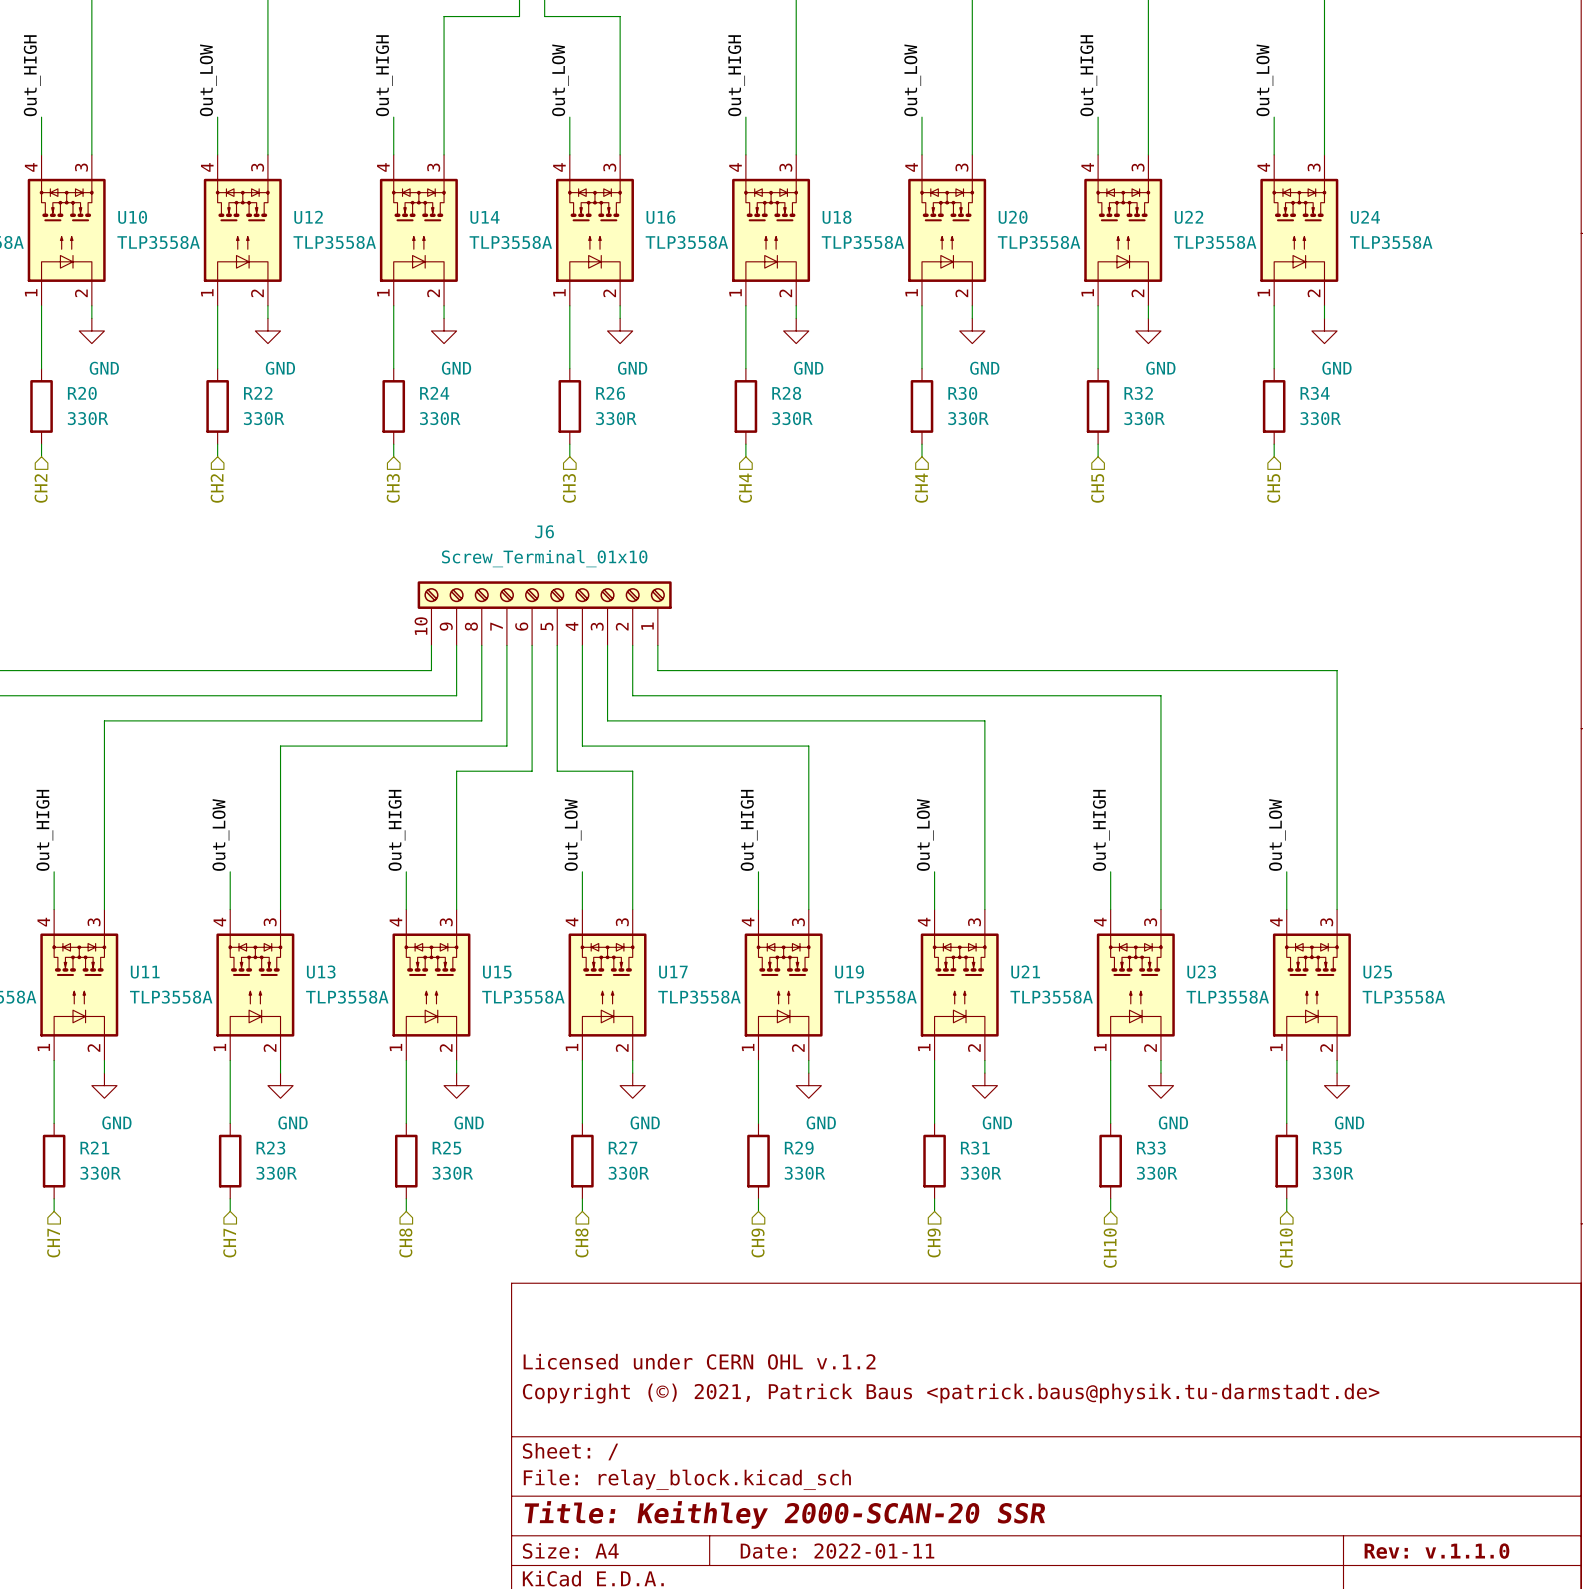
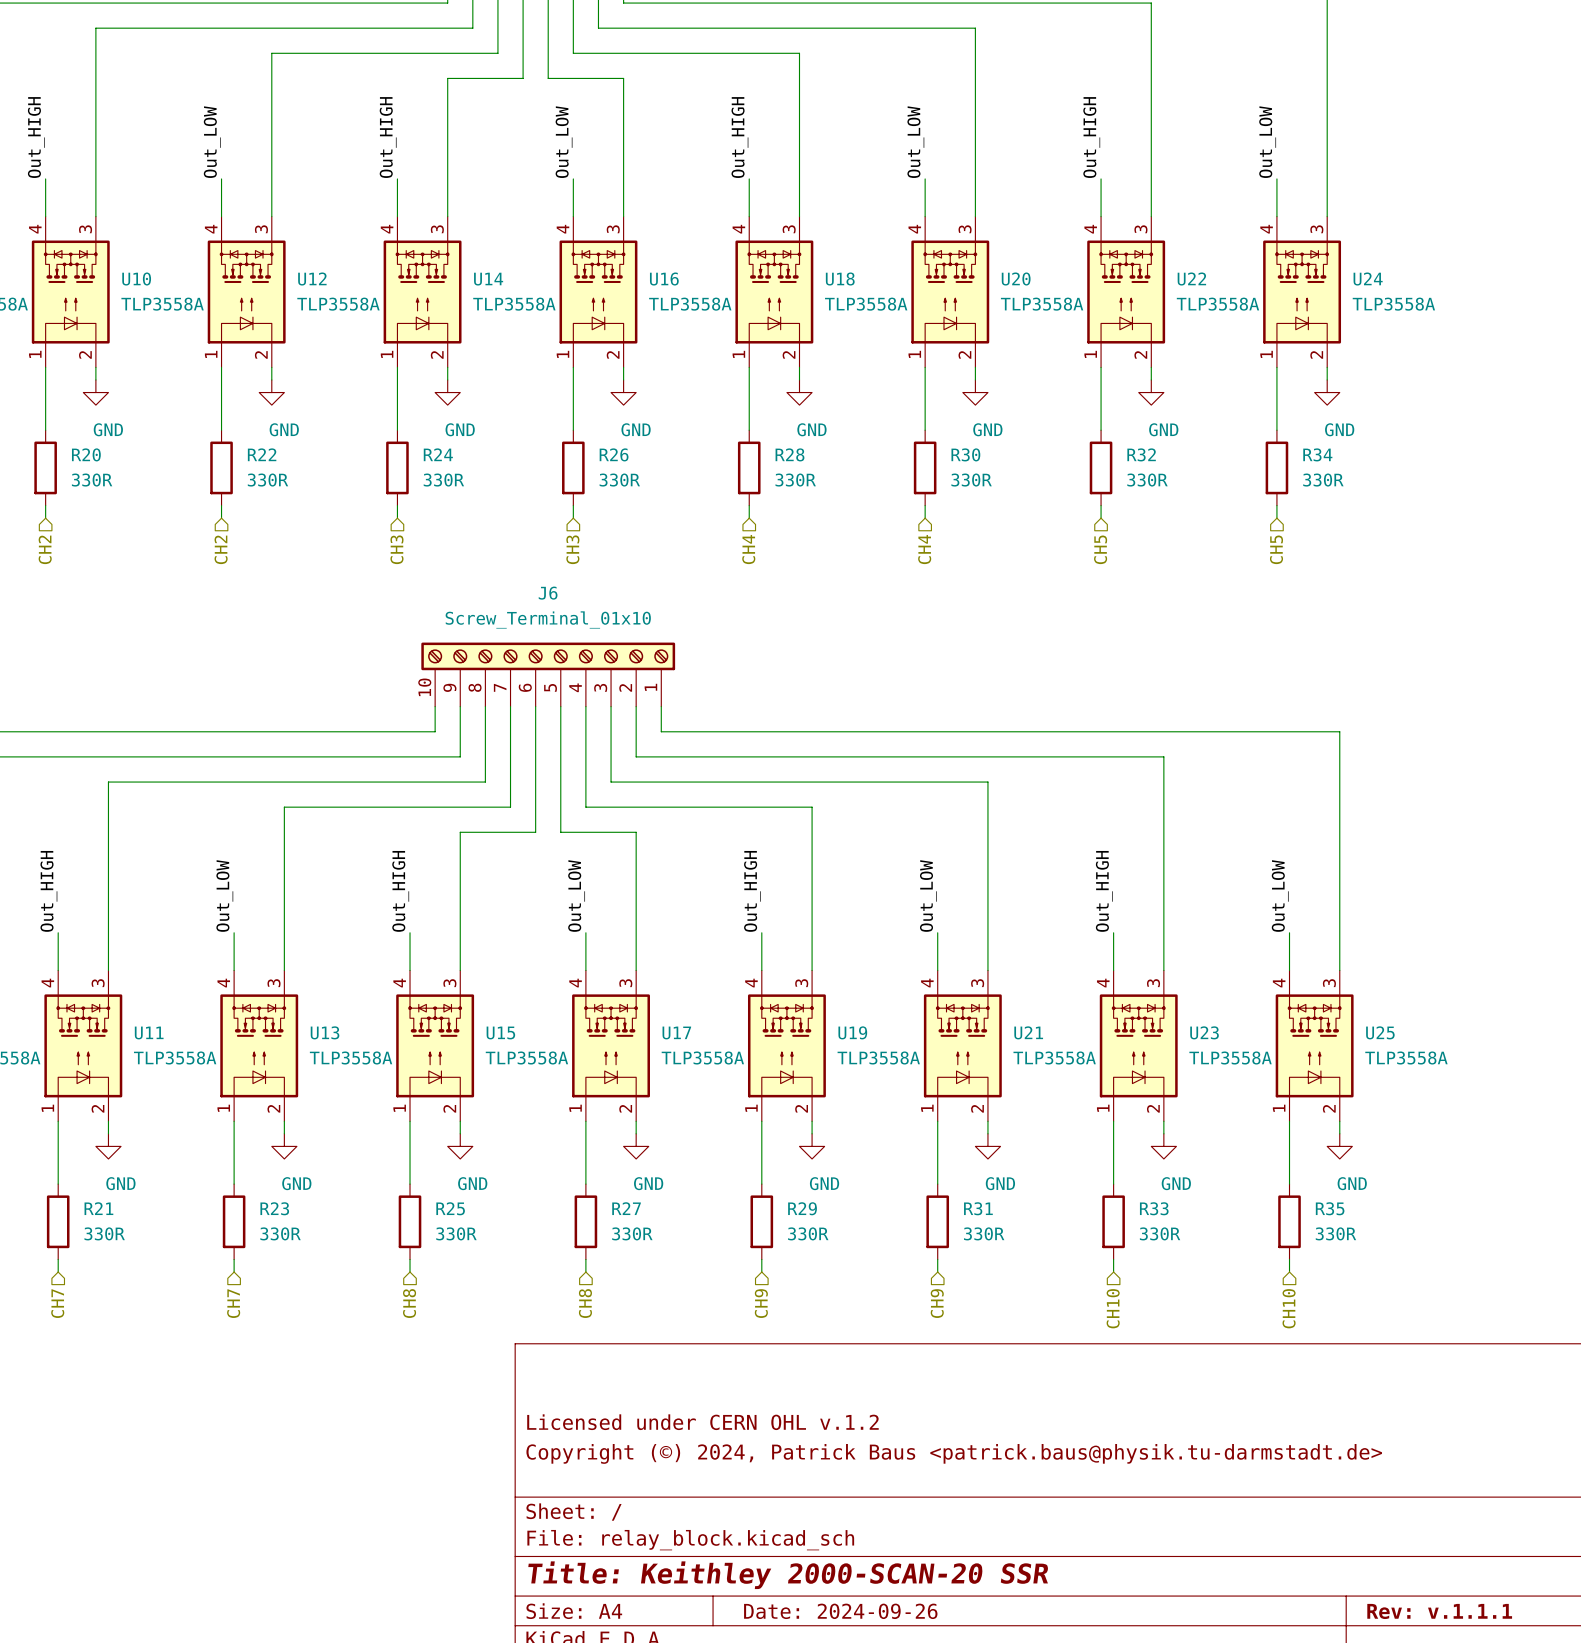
title block: Copyright (©) 2021, Patrick Baus <patrick.baus@physik.tu-darmstadt.de> (951, 1393) -> Copyright (©) 2024, Patrick Baus <patrick.baus@physik.tu-darmstadt.de> (954, 1453)
title block: Date: 2022-01-11 (837, 1551) -> Date: 2024-09-26 (840, 1611)
title block: Rev: v.1.1.0 (1436, 1551) -> Rev: v.1.1.1 (1439, 1611)

